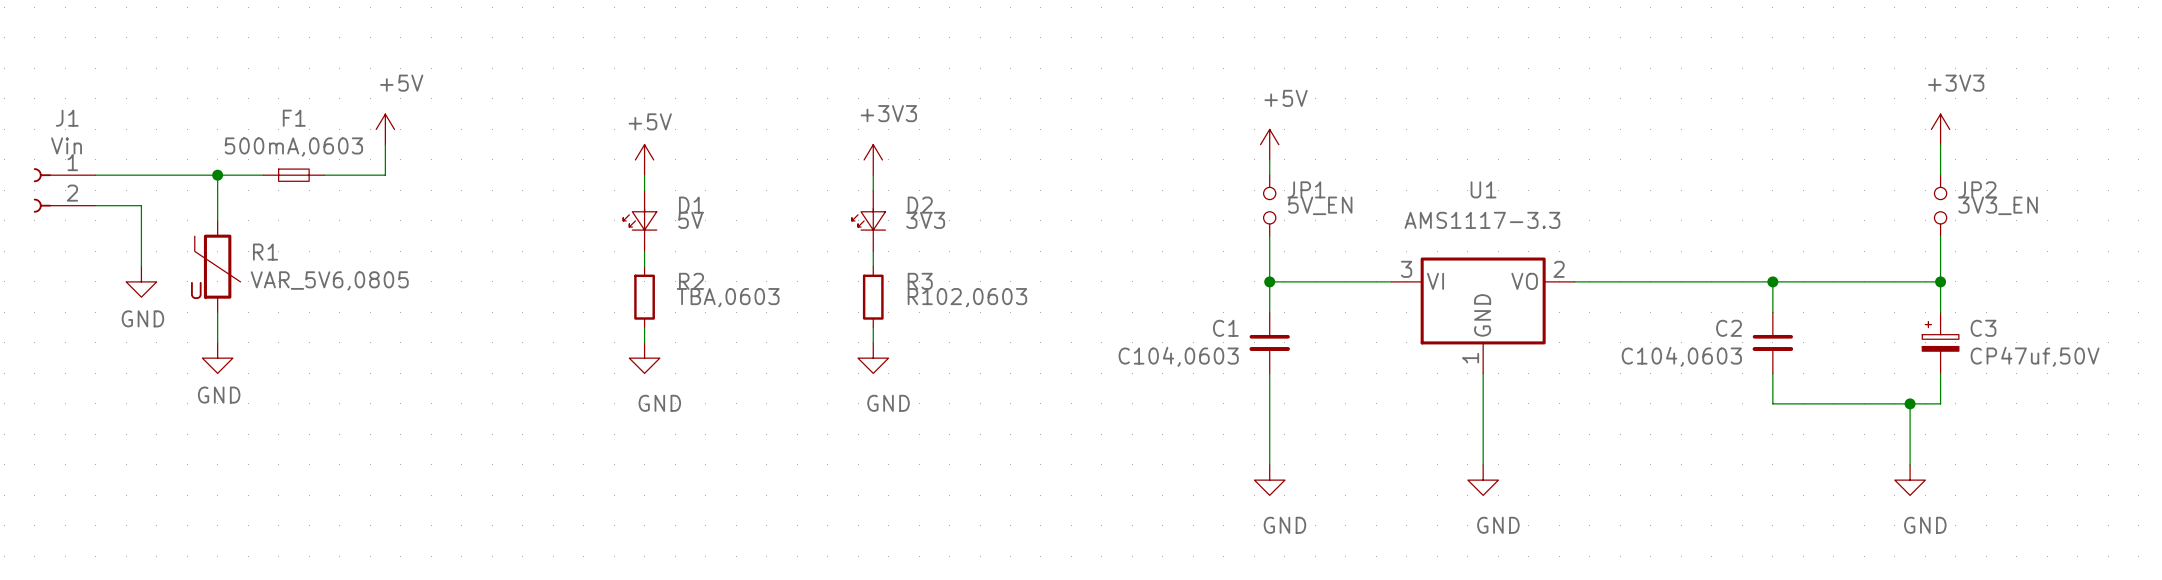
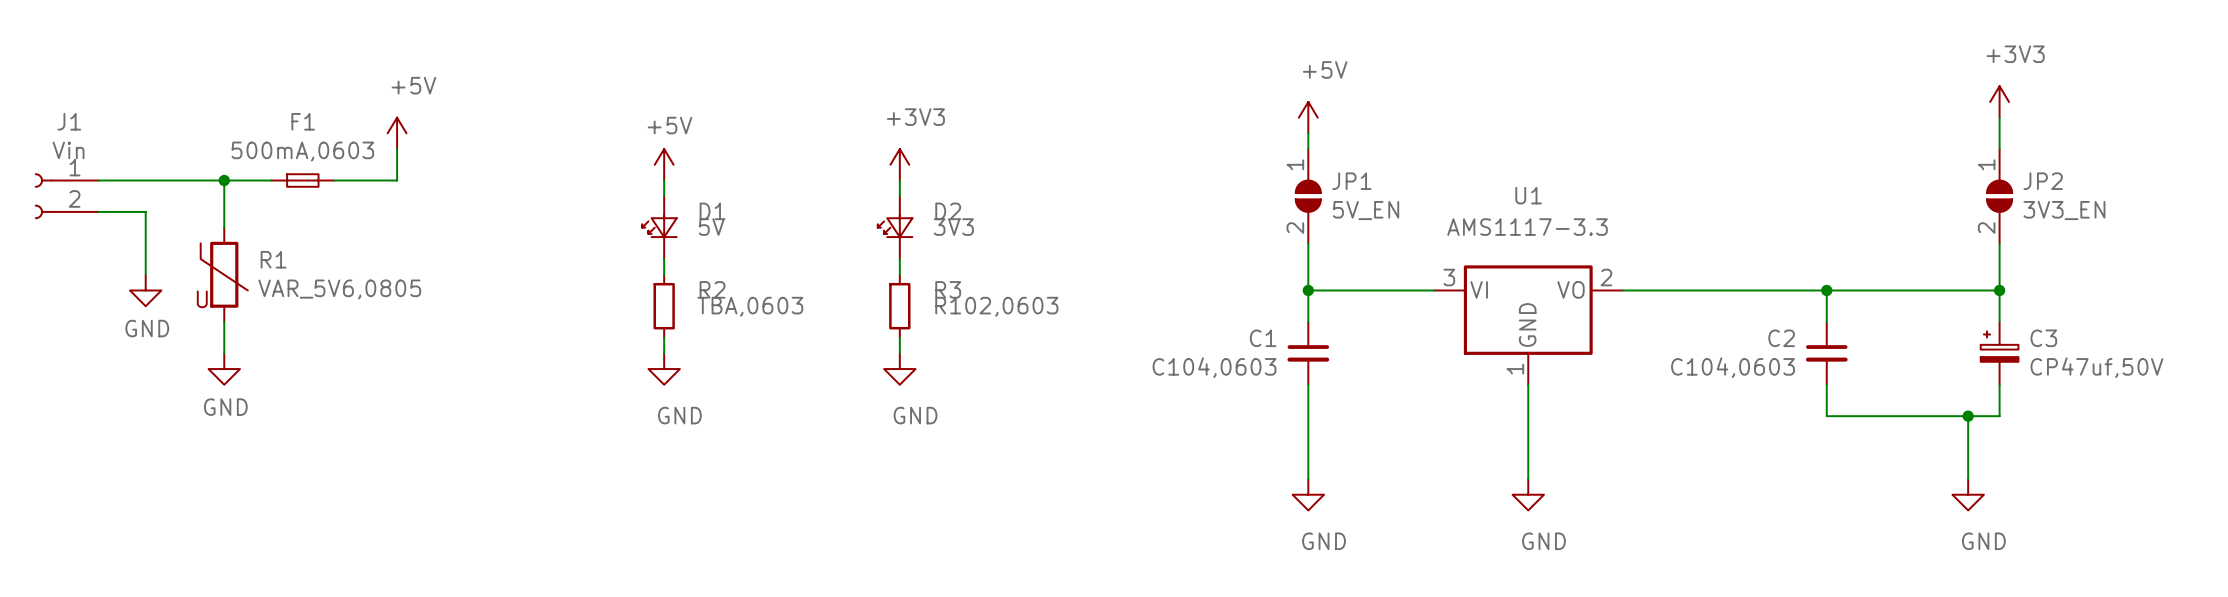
power symbol position: +3V3 (1940, 129) -> +3V3 (1999, 101)
power symbol position: +5V (1269, 144) -> +5V (1308, 117)
JP1 symbol: [1263, 175, 1276, 237] -> [1295, 149, 1321, 244]
JP2 symbol: [1934, 175, 1947, 237] -> [1987, 149, 2013, 244]

